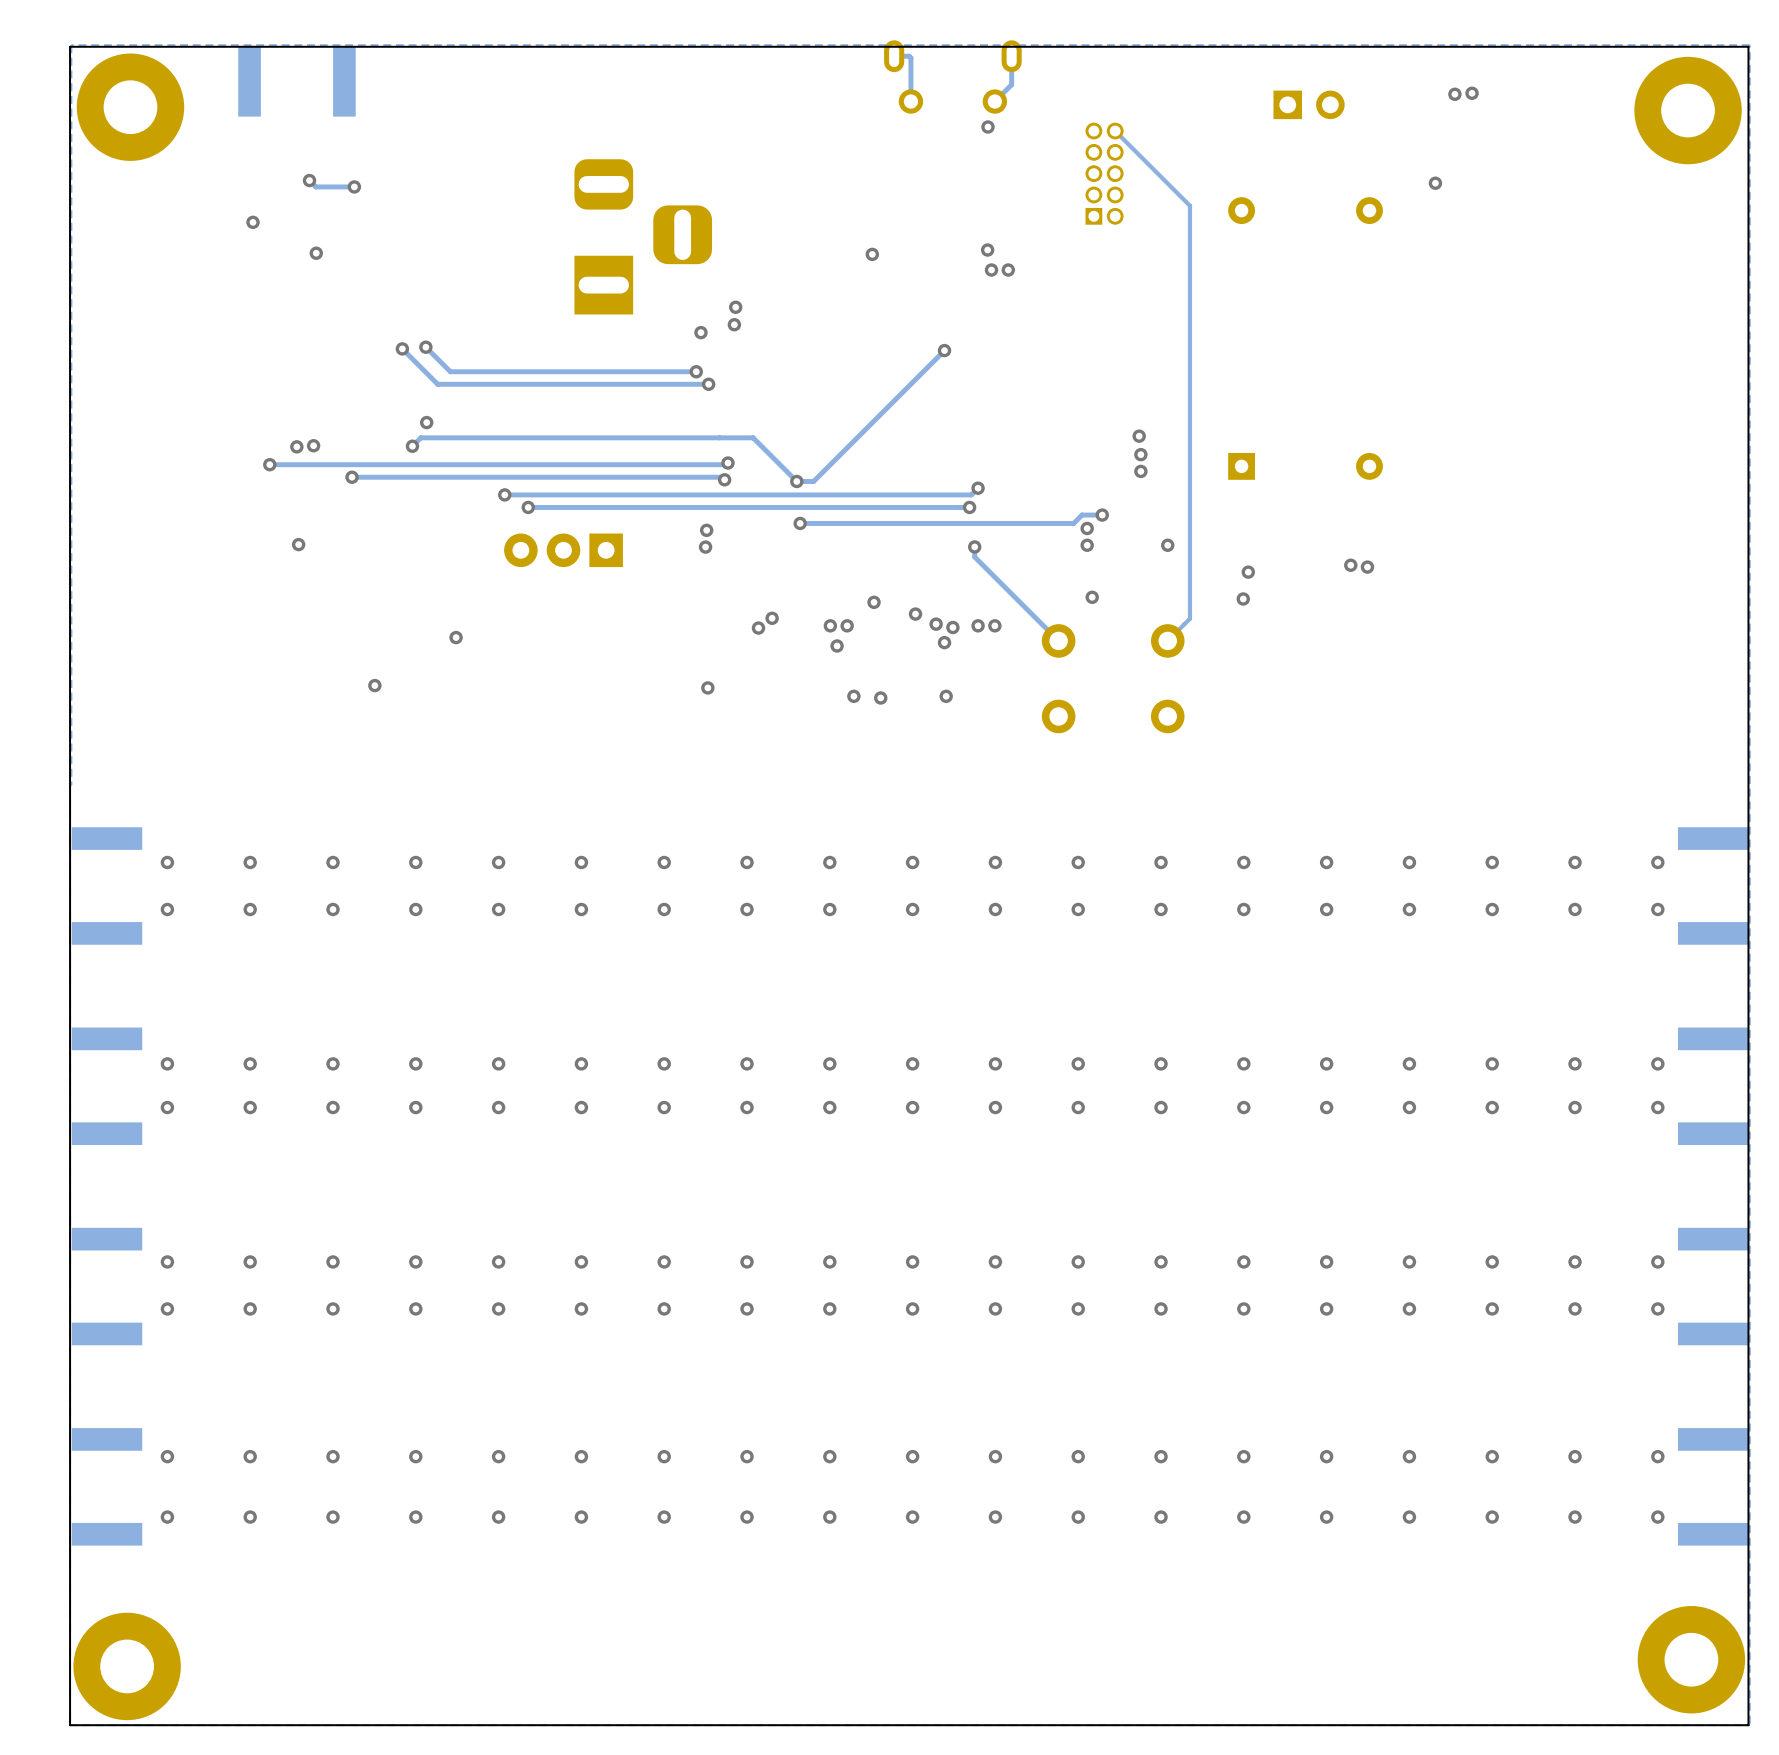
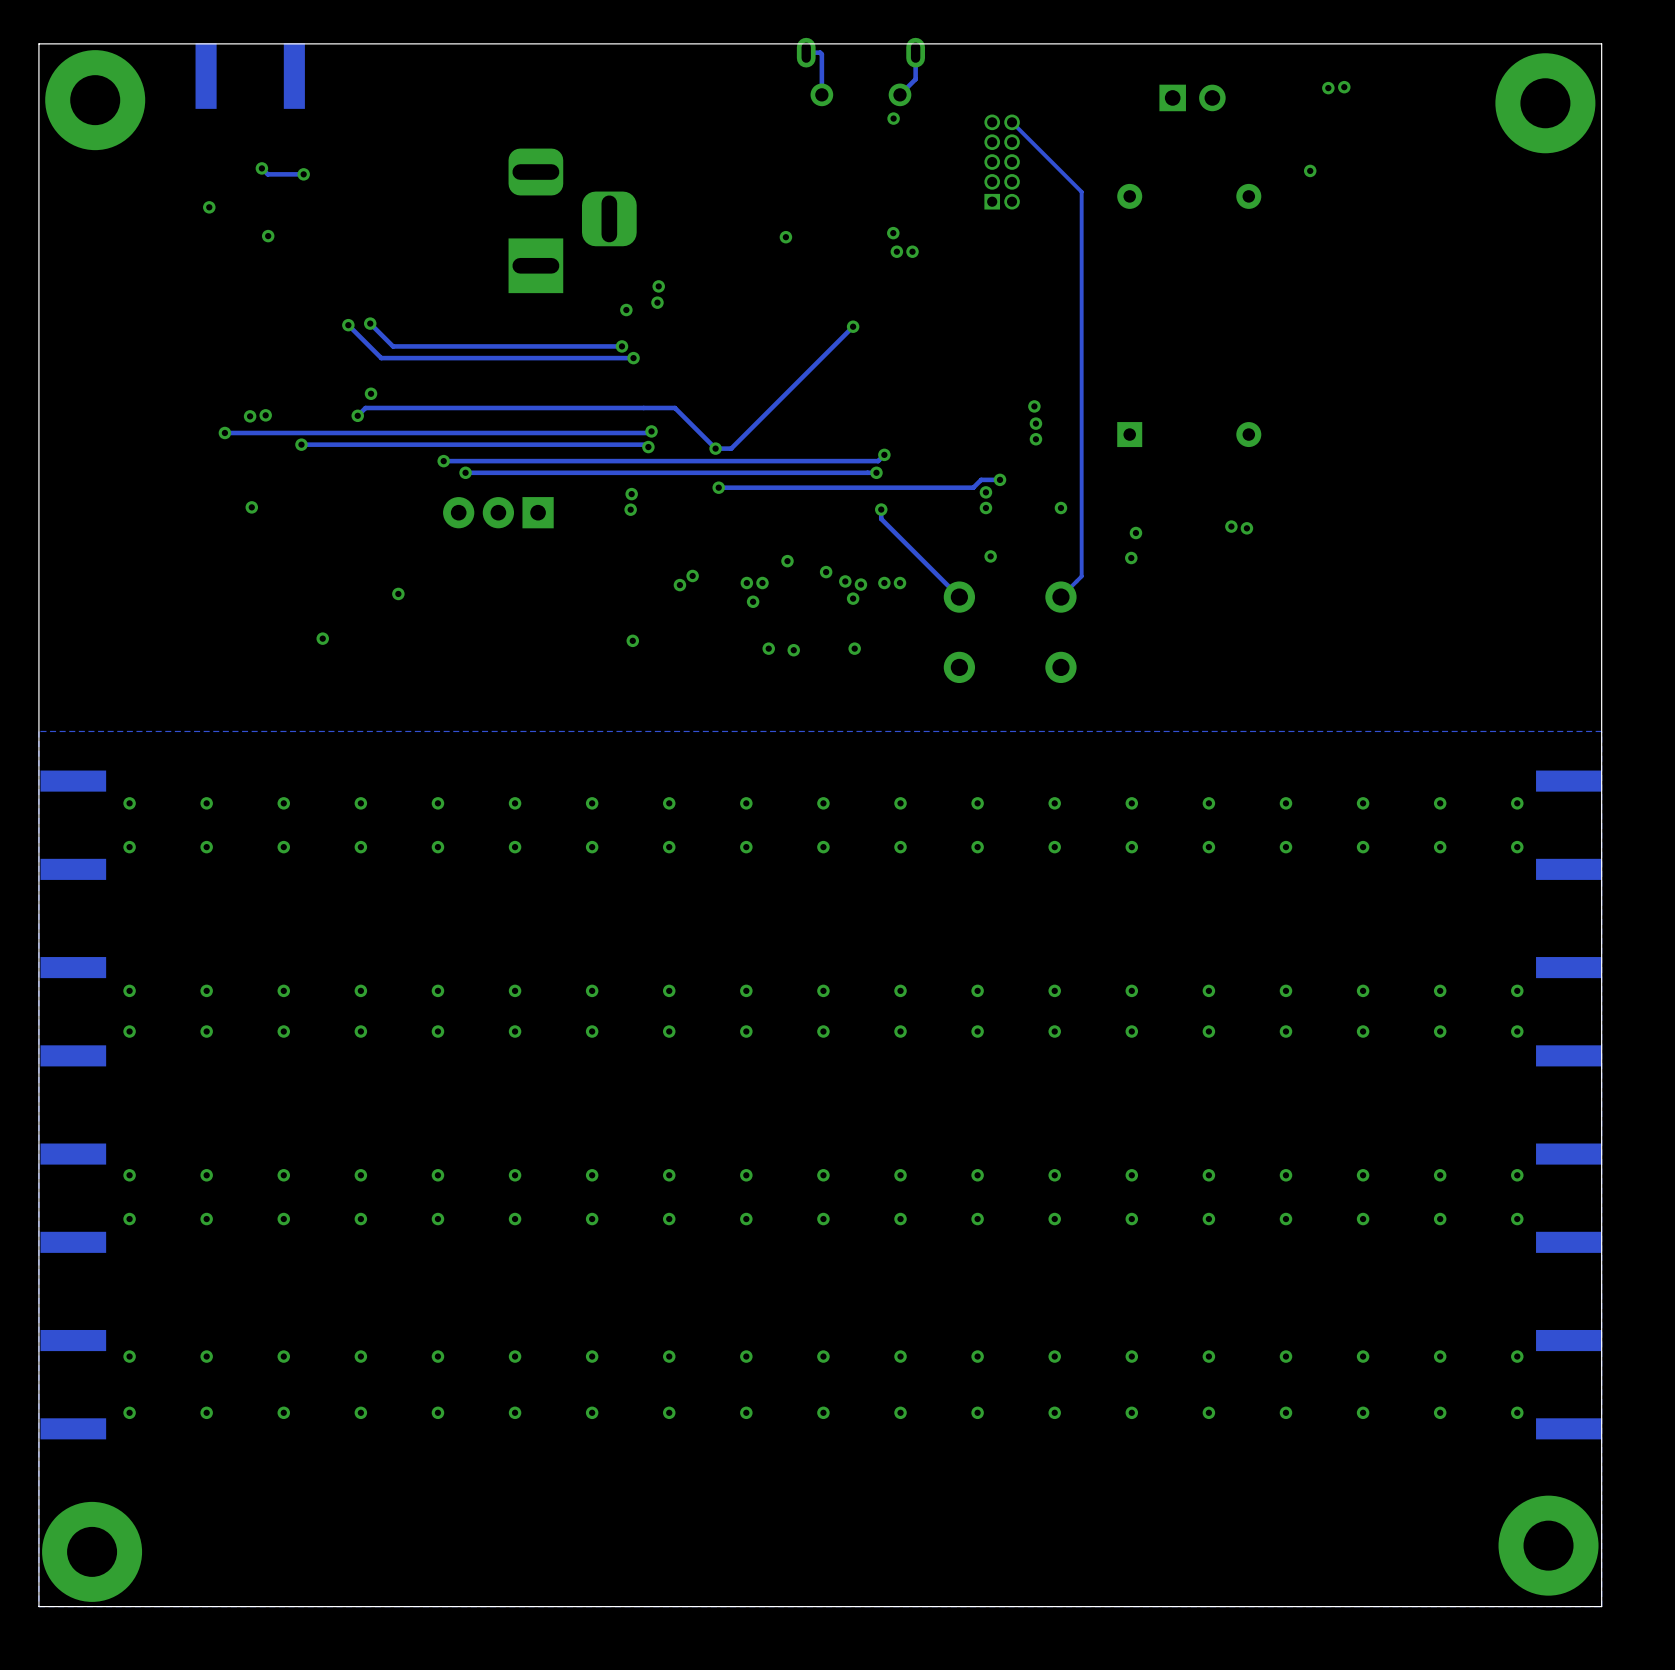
zone outline: (71, 785) (71, 45) (1749, 45) (1748, 1723) -> (40, 731) (1601, 731) (1601, 1605)

